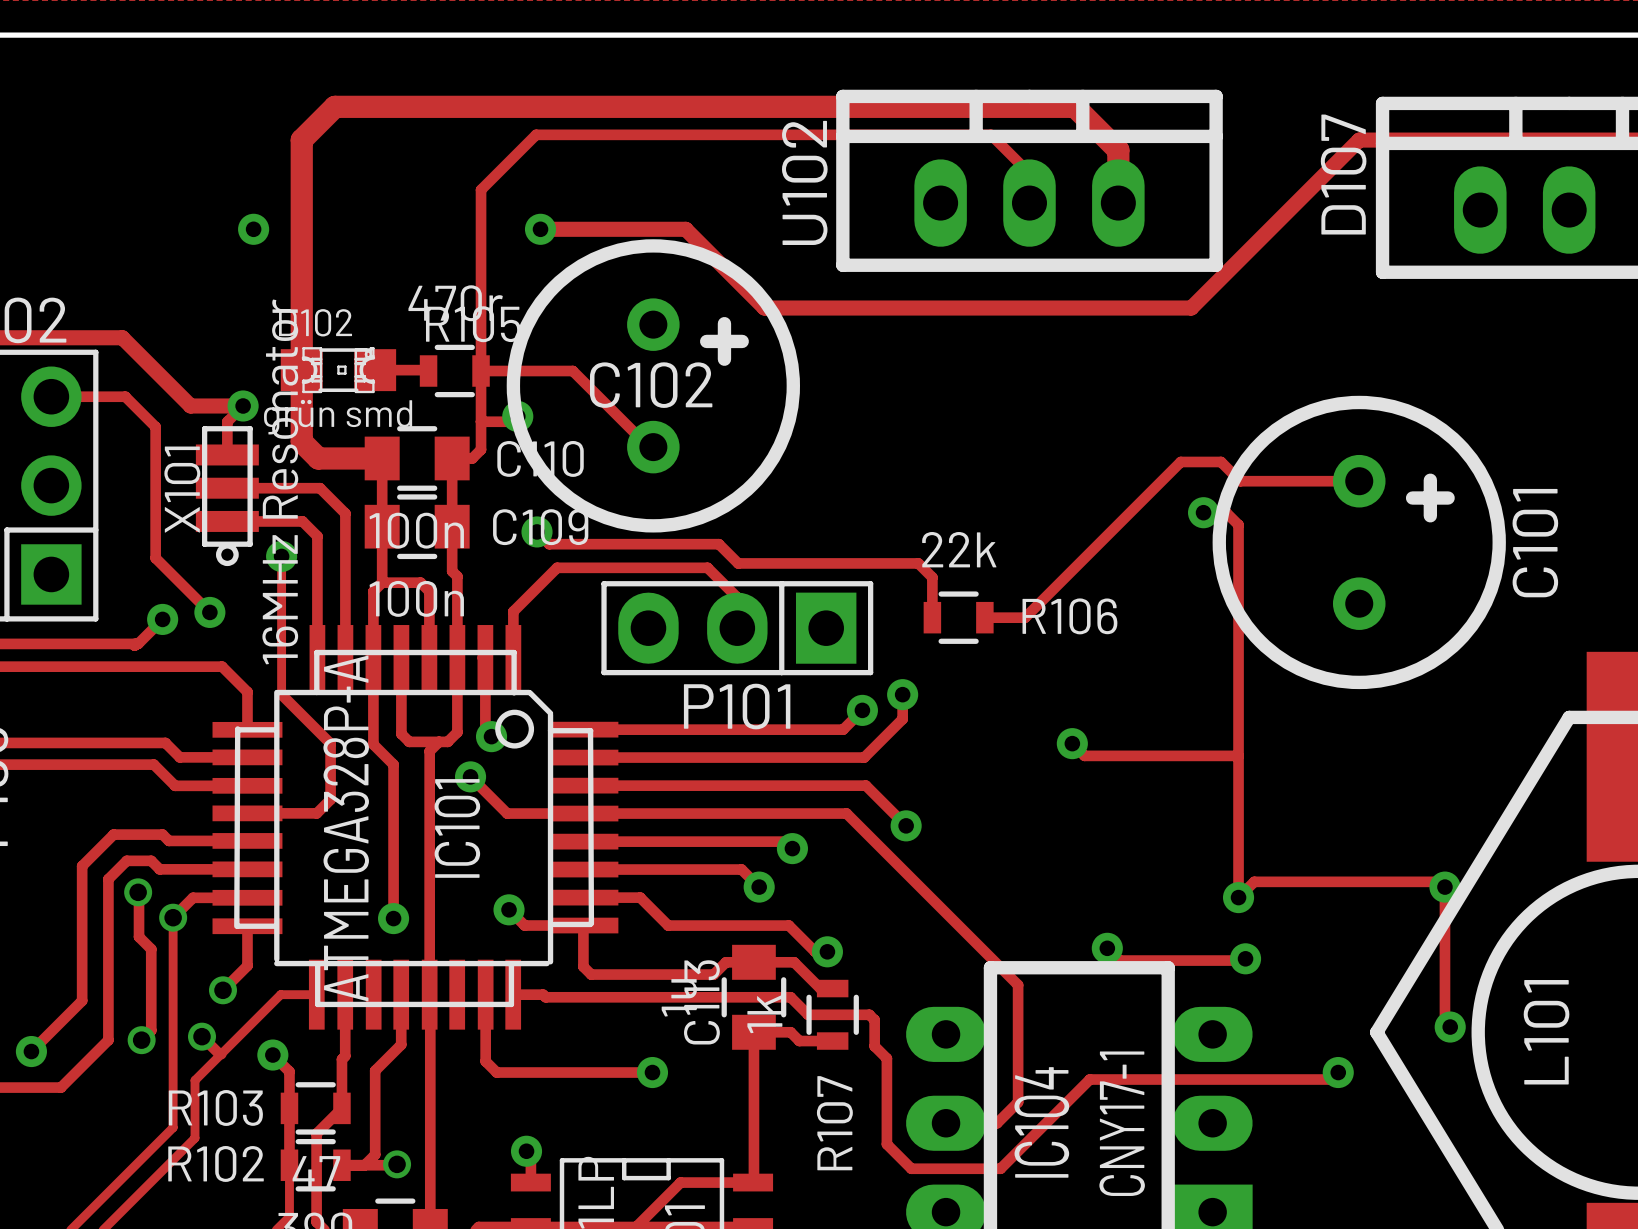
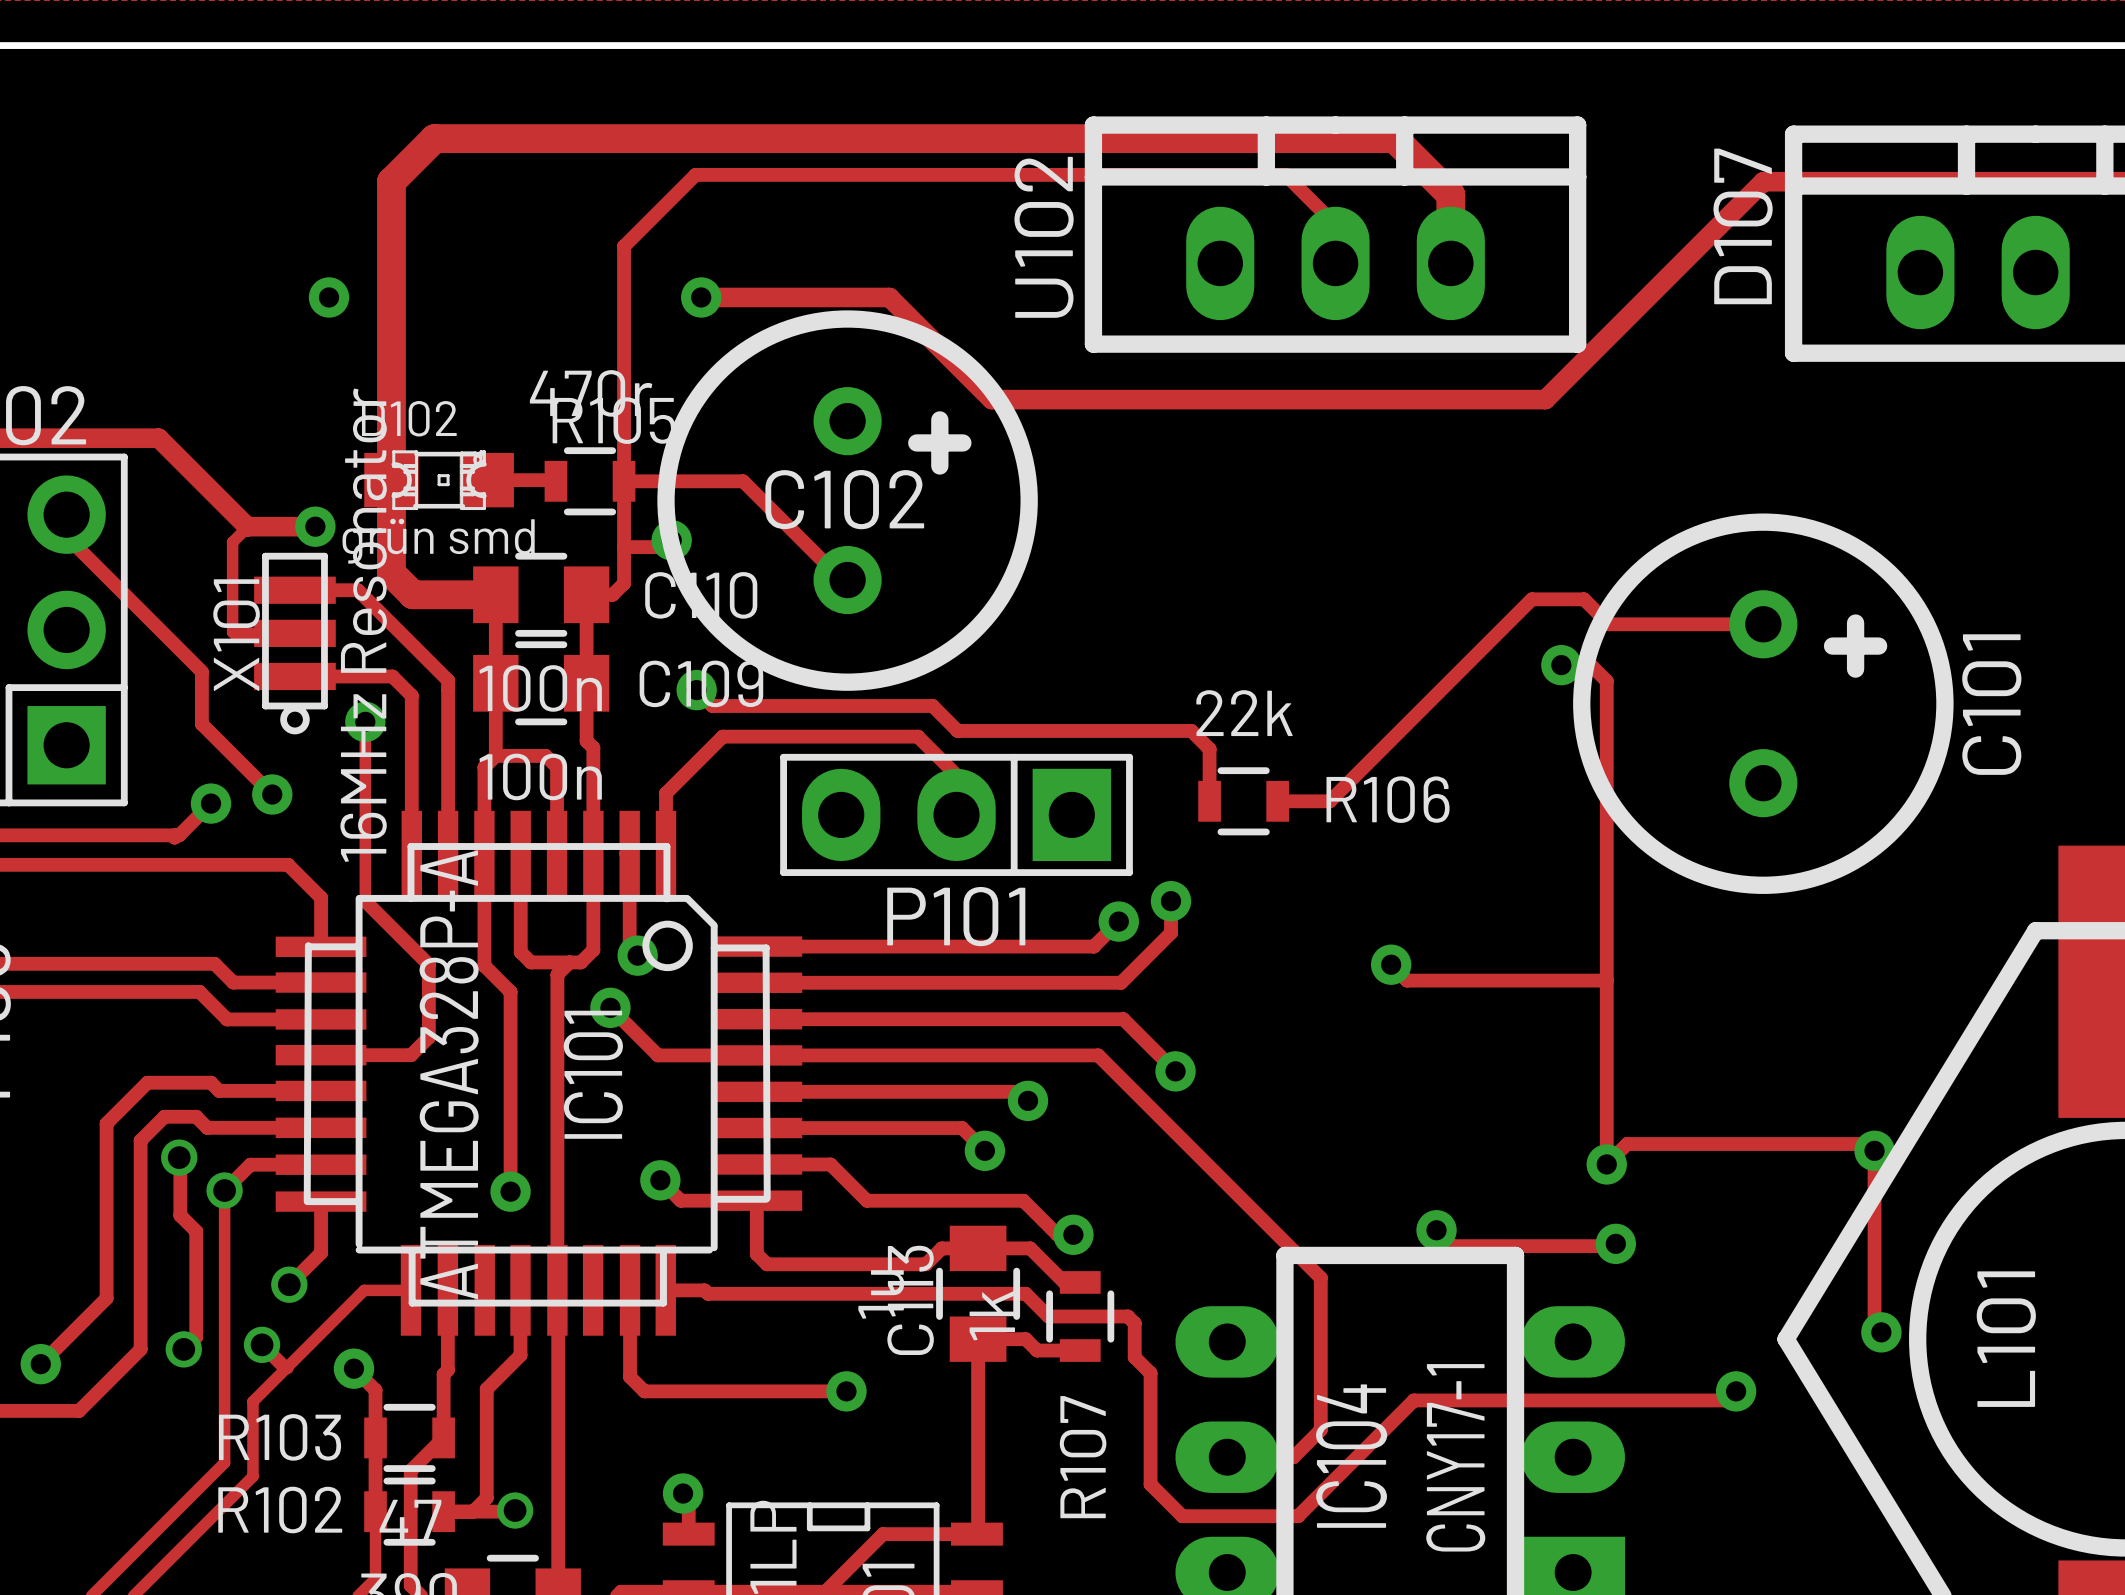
track: (51, 396) (125, 396) (155, 426) (155, 518) -> (66, 514) (66, 536) (201, 671)
track: none -> (248, 526) (232, 542) (232, 632) (294, 633)
track: (243, 405) (227, 421) (227, 454) -> none
track: (227, 488) (320, 488) (345, 513) (345, 530) -> (294, 590) (357, 590) (448, 680) (448, 688)

